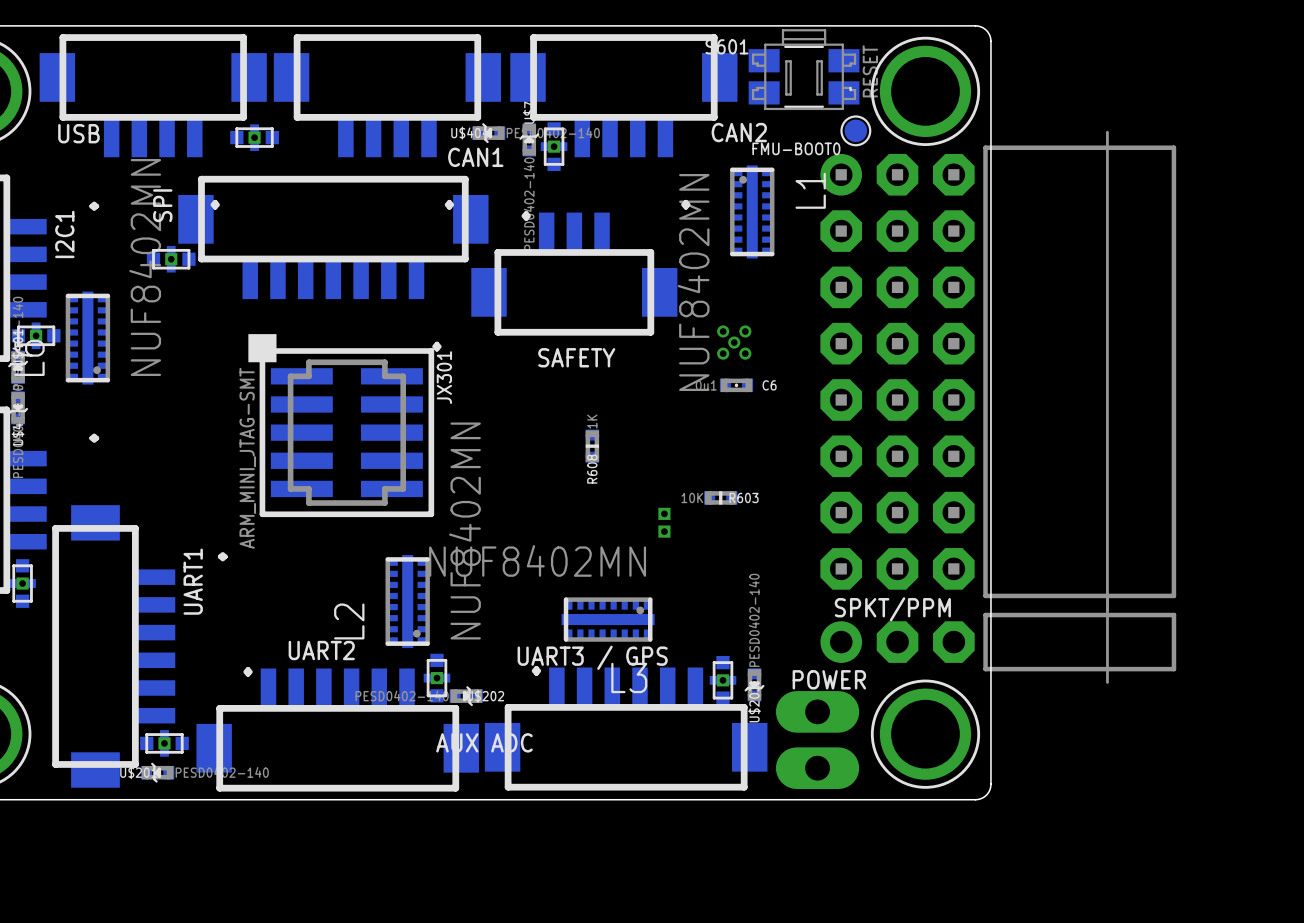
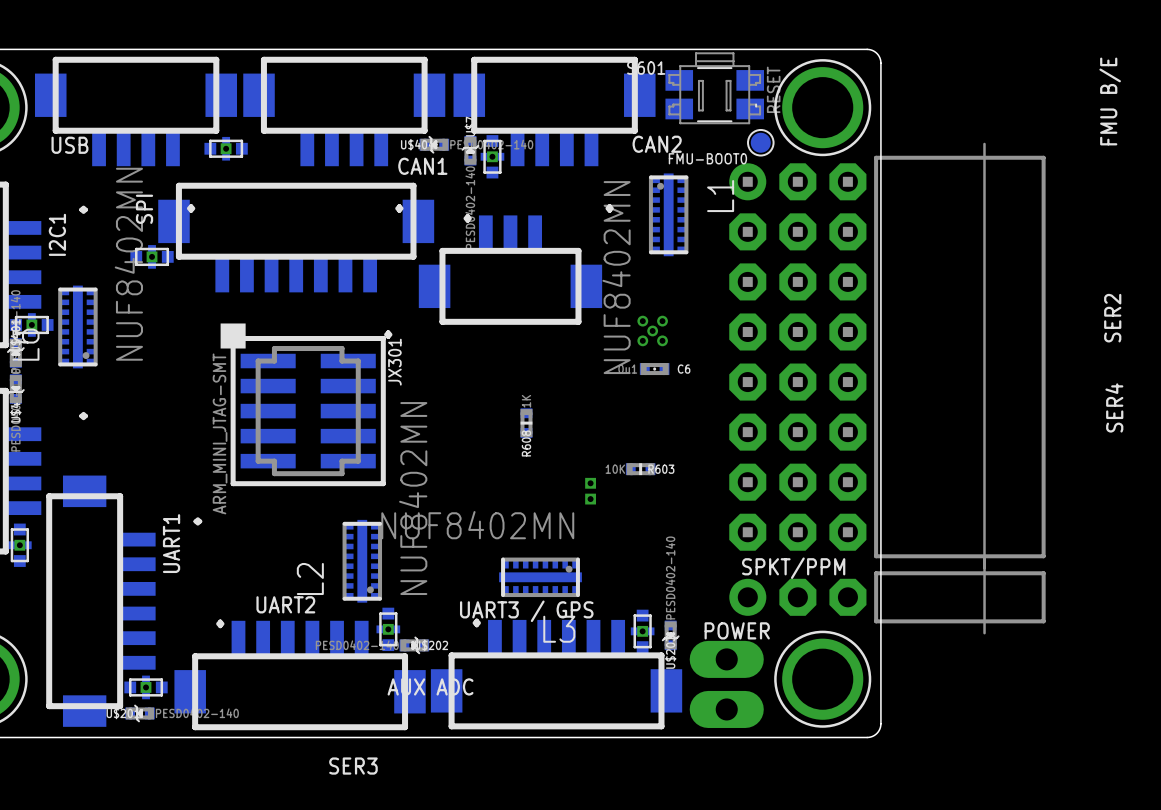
text: none -> FMU B/E (1110, 101)
text: none -> SER2 (1112, 318)
text: SAFETY (576, 357) -> none
text: none -> SER4 (1114, 407)
text: none -> SER3 (353, 766)

